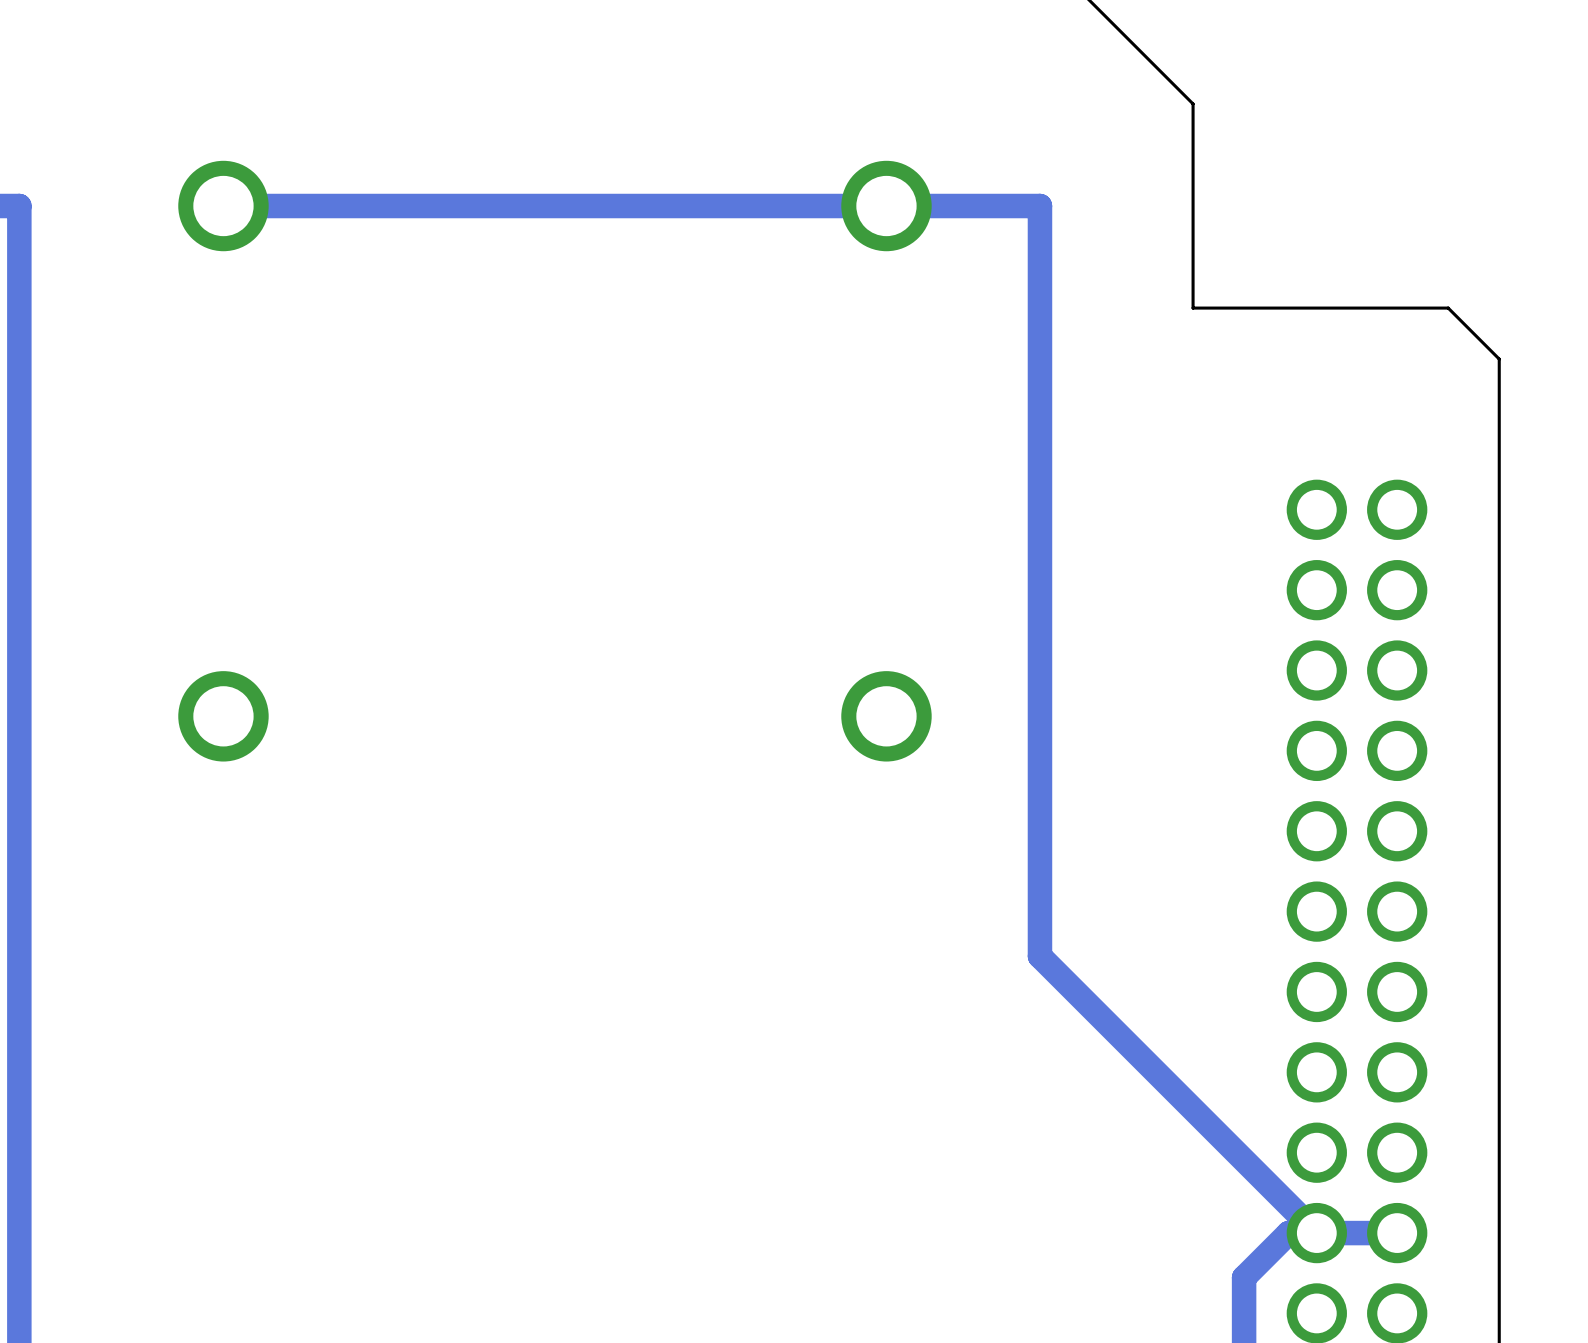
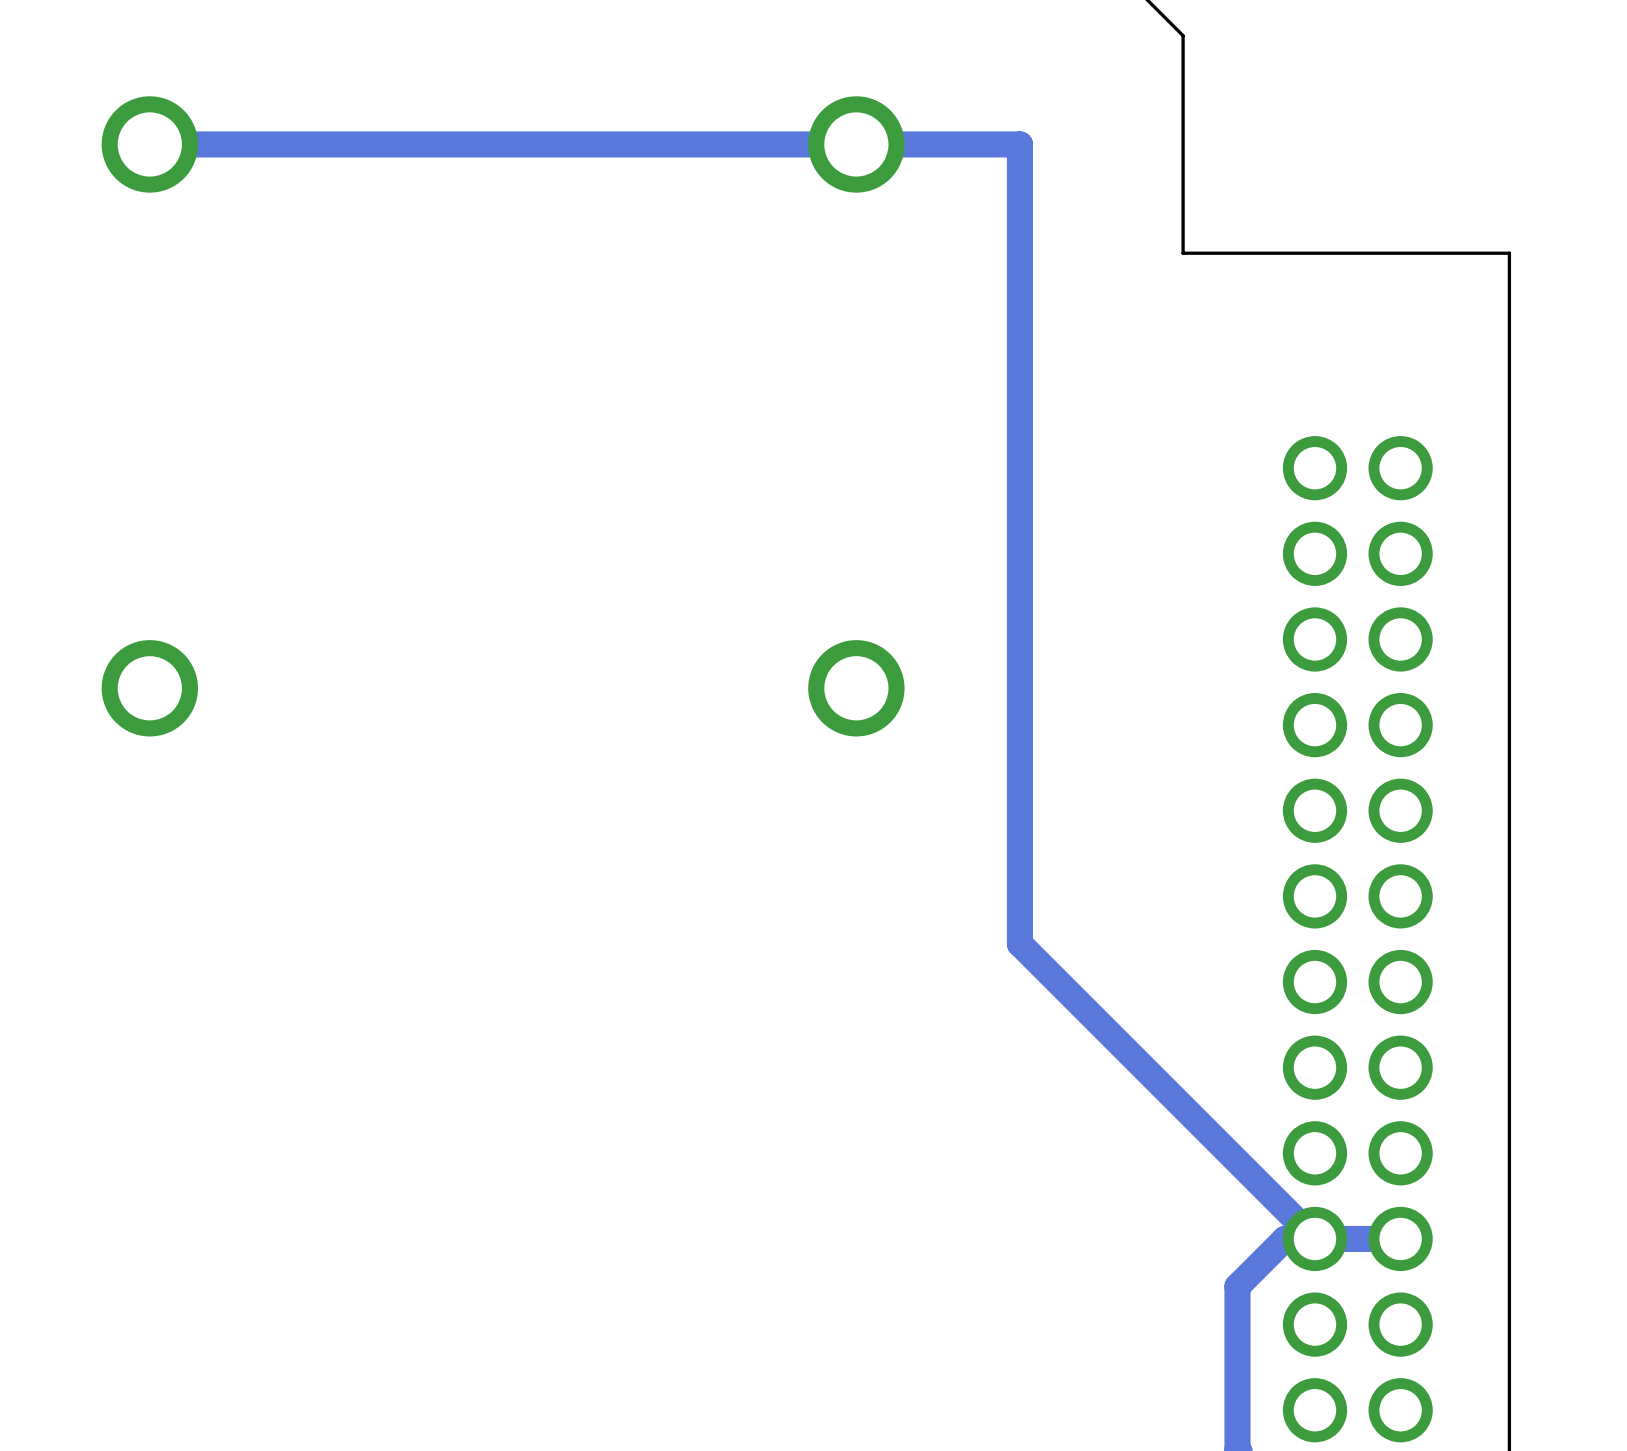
board edge: (1448, 308) (1499, 359) -> (1455, 253) (1509, 253) (1509, 307)

